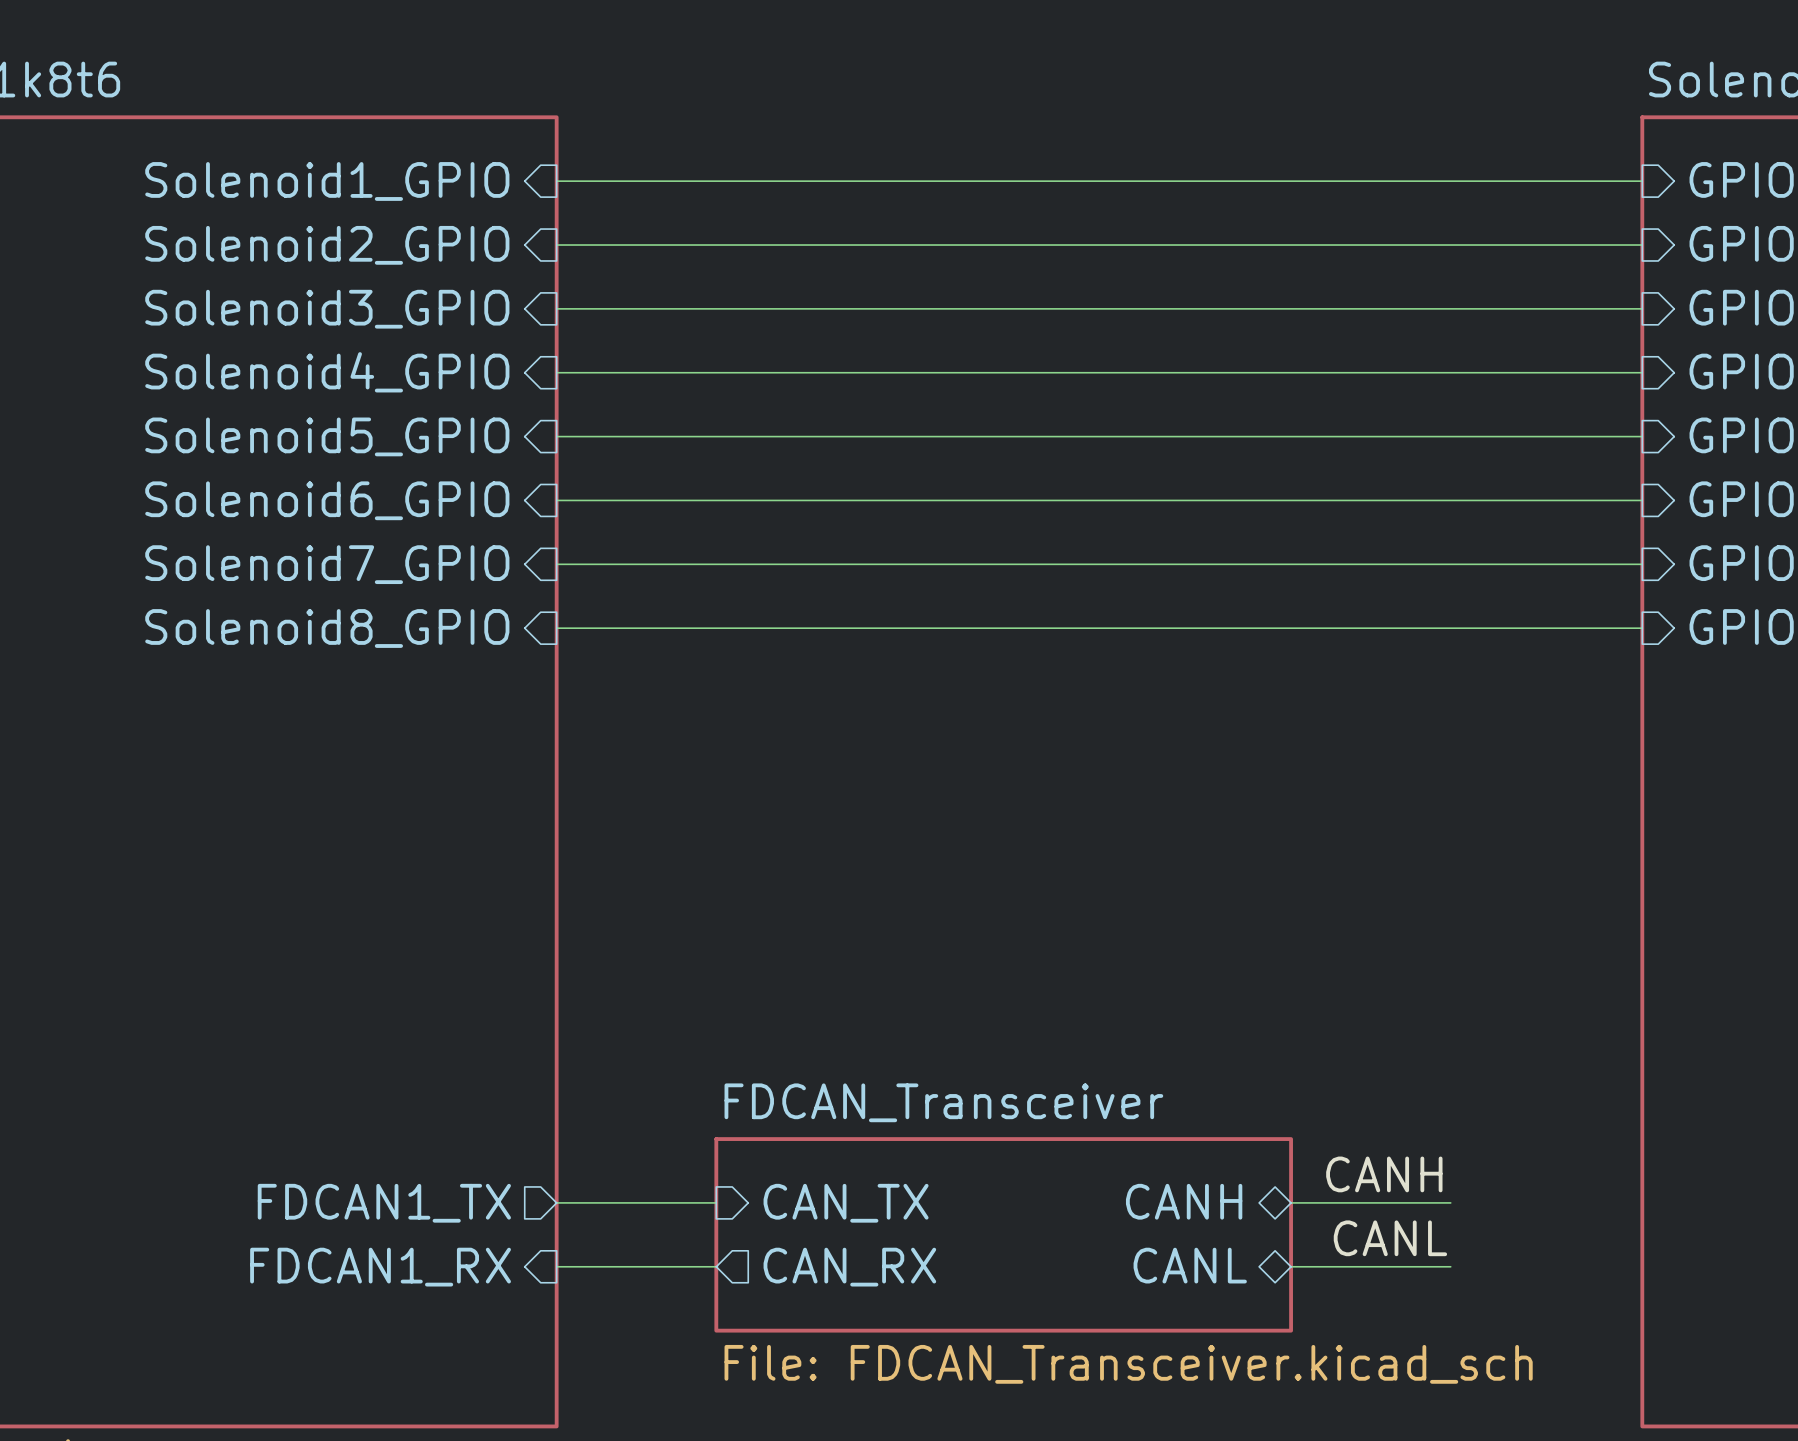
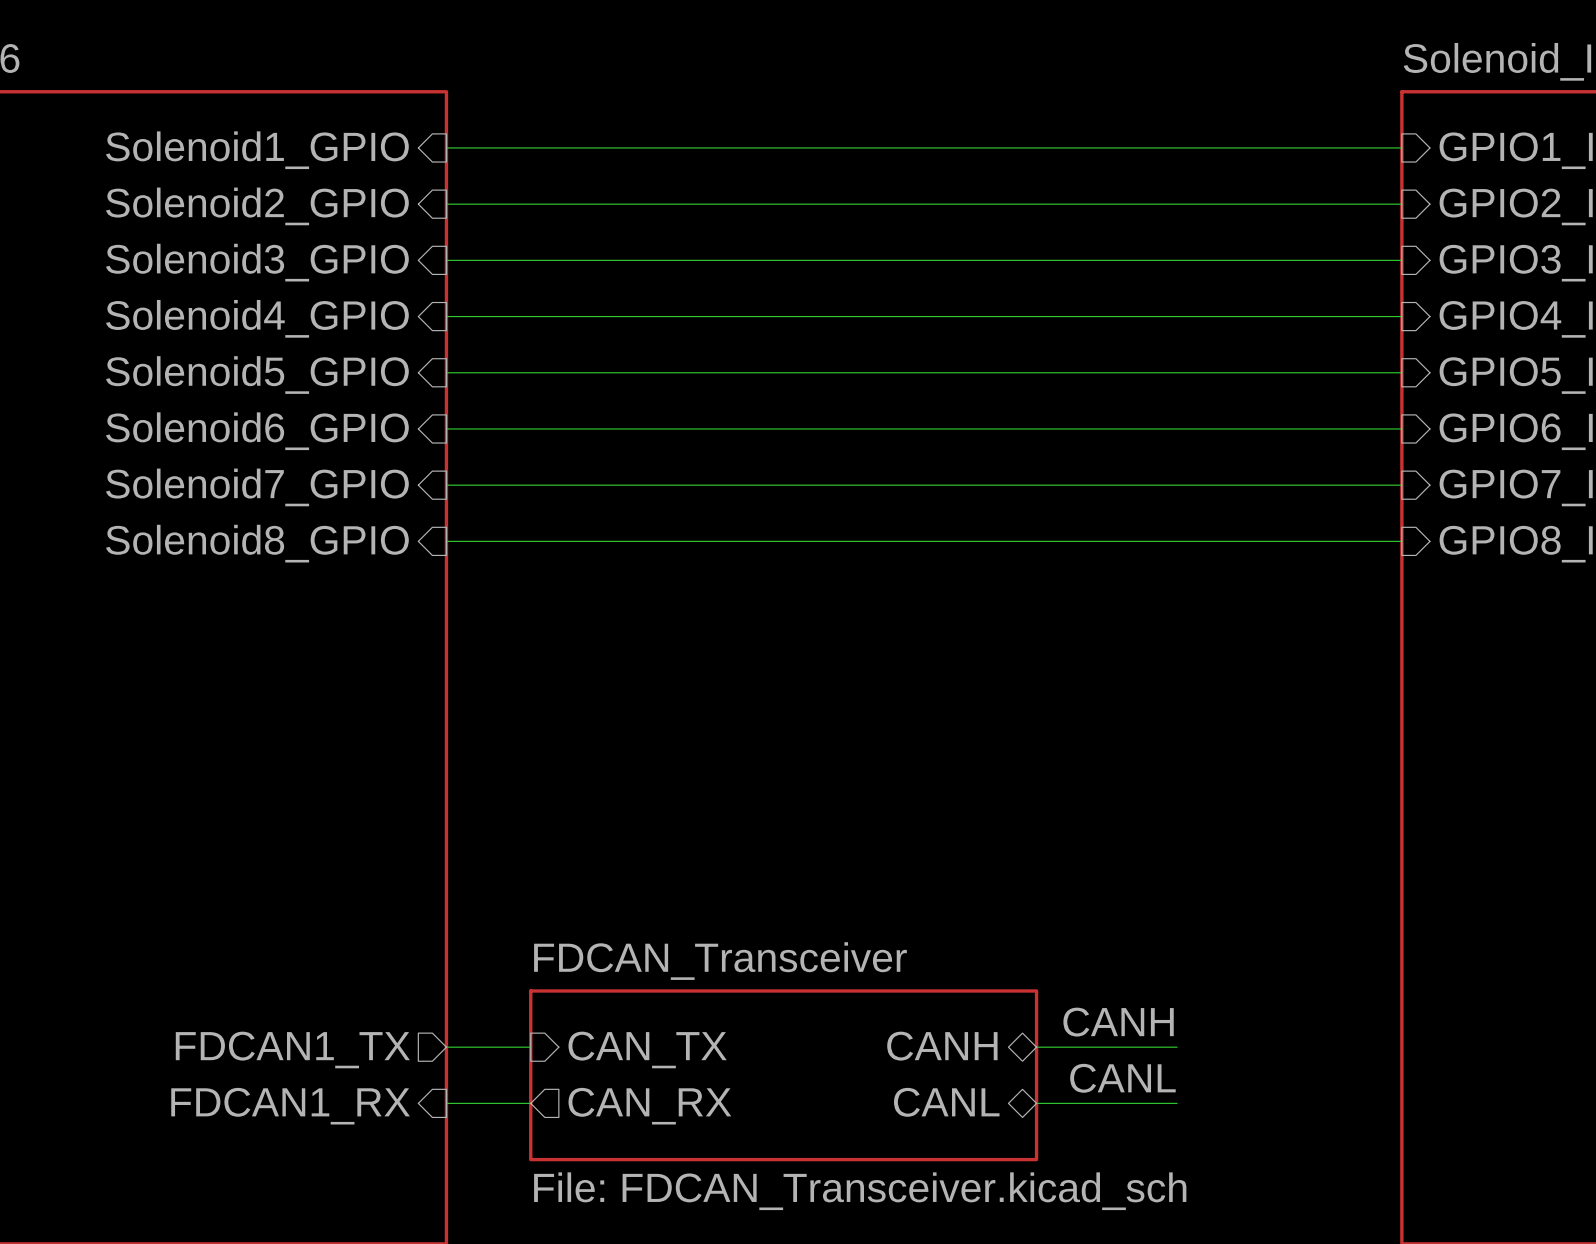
label position: CANH (1384, 1174) -> CANH (1118, 1022)
sheet pin position: CANH (1184, 1201) -> CANH (942, 1046)
wire: (652, 1202) (716, 1202) -> none
wire: (1386, 1202) (1450, 1202) -> (1036, 1047) (1092, 1047)
sheet pin position: CAN_TX (846, 1203) -> CAN_TX (647, 1049)
sheet FDCAN_Transceiver position: (1003, 1234) -> (783, 1075)
label position: CANL (1390, 1238) -> CANL (1122, 1078)
sheet pin position: CANL (1190, 1265) -> CANL (946, 1102)
wire: (652, 1266) (716, 1266) -> none
wire: (1386, 1266) (1450, 1266) -> (1036, 1103) (1092, 1103)
sheet pin position: CAN_RX (849, 1267) -> CAN_RX (649, 1106)

